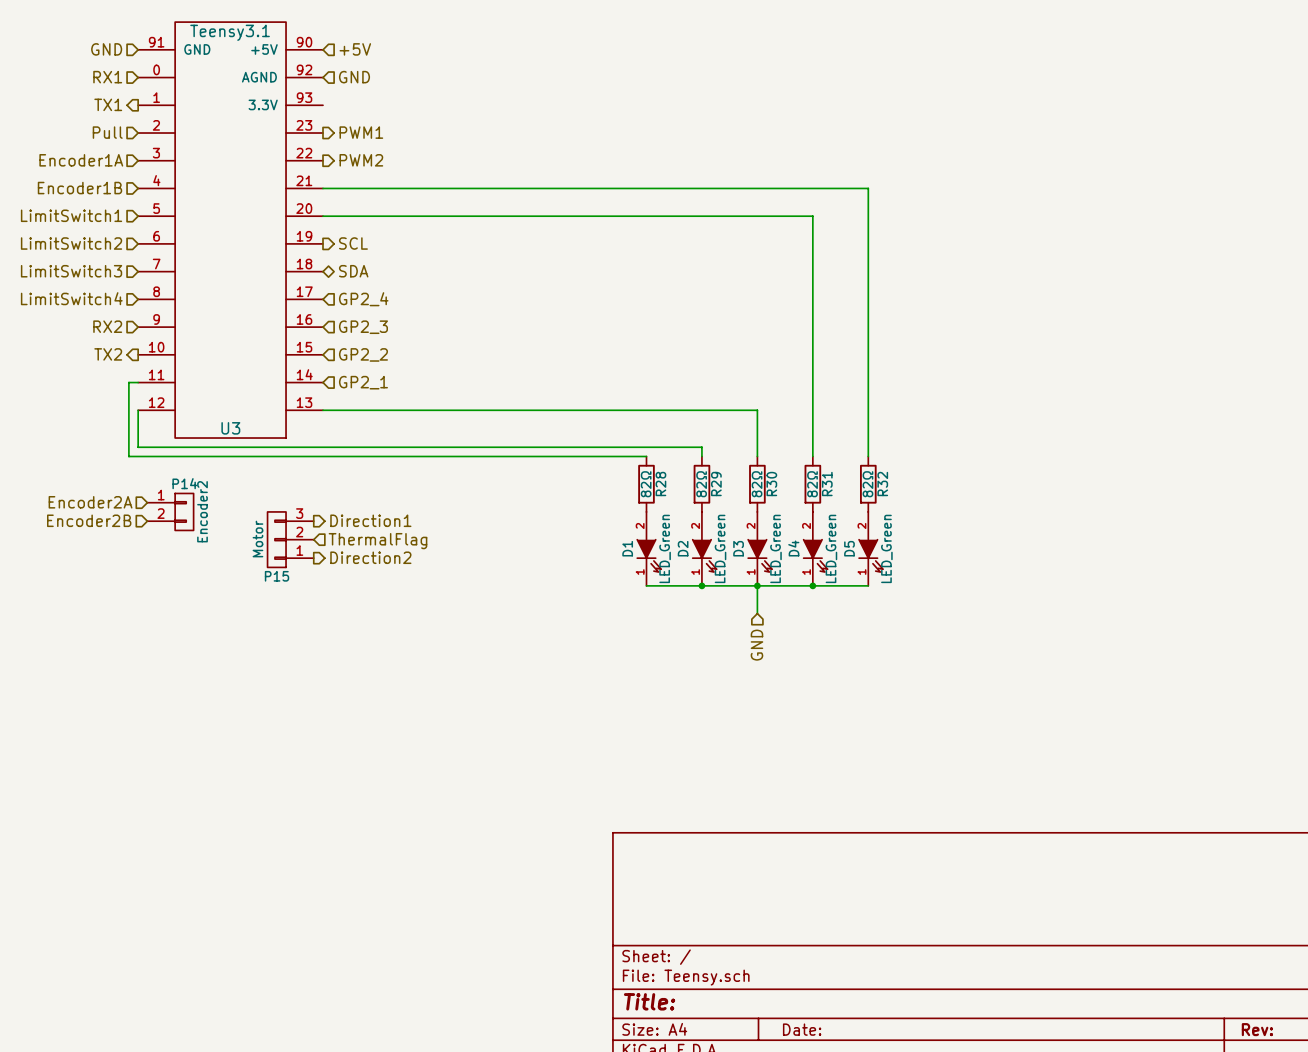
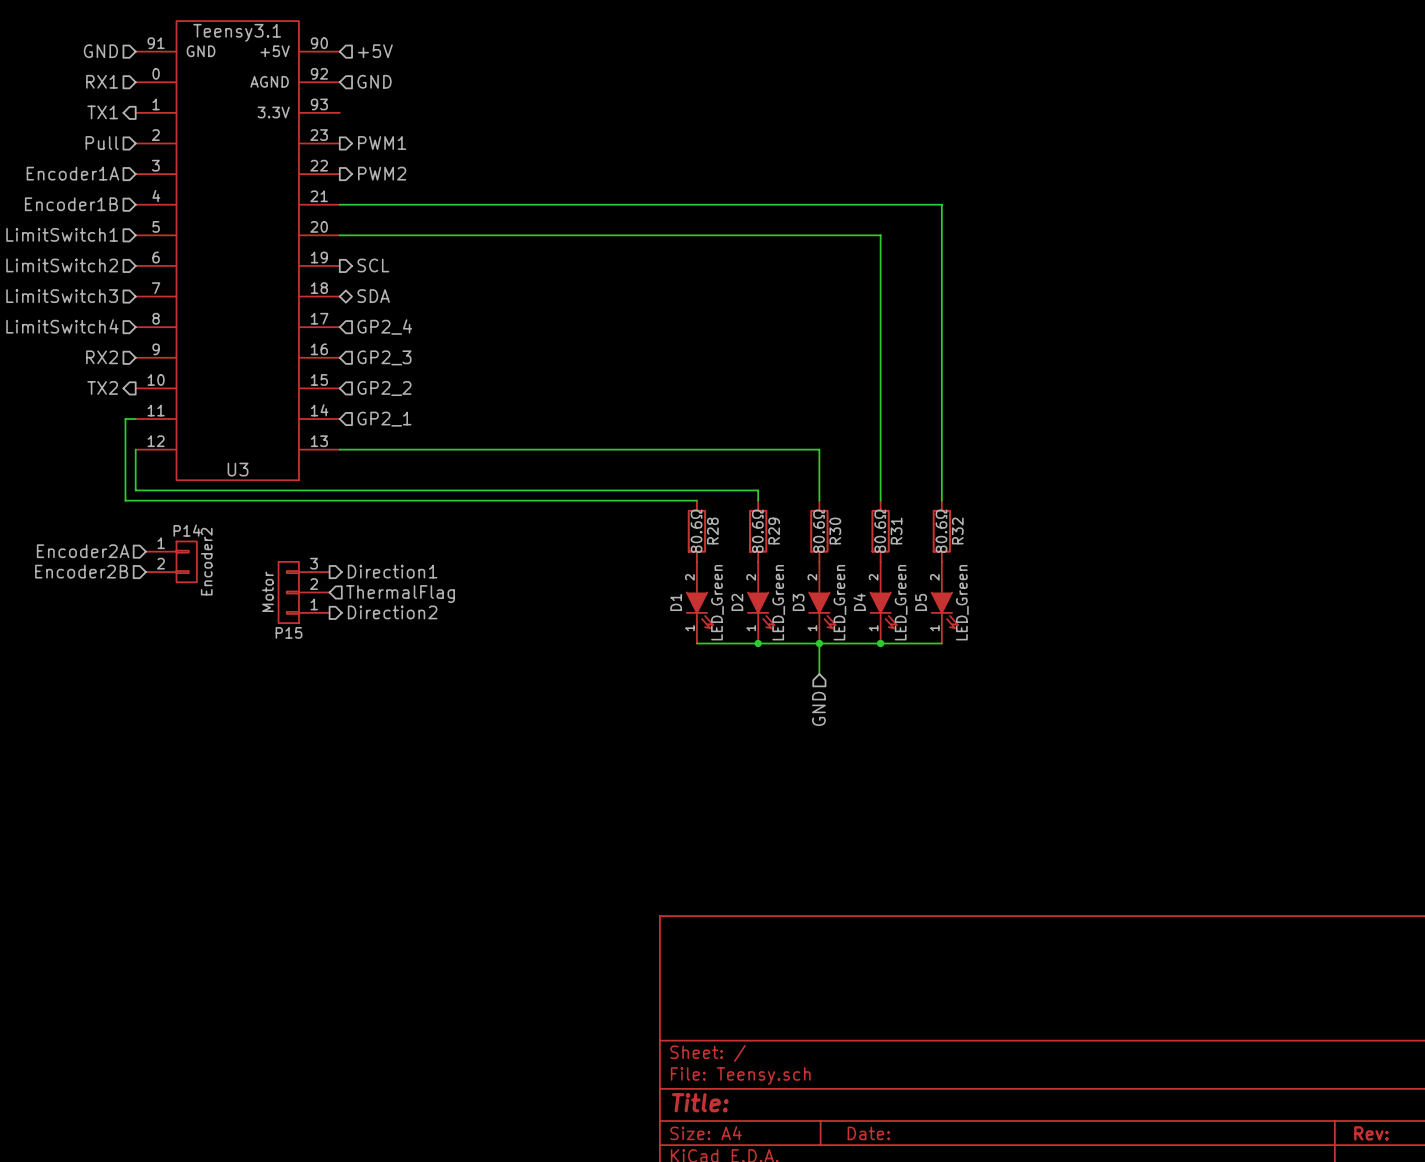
R28 value: 82Ω (646, 484) -> 80.6Ω (696, 531)
R29 value: 82Ω (701, 484) -> 80.6Ω (757, 531)
R30 value: 82Ω (757, 484) -> 80.6Ω (819, 531)
R31 value: 82Ω (812, 484) -> 80.6Ω (880, 531)
R32 value: 82Ω (867, 484) -> 80.6Ω (941, 531)

